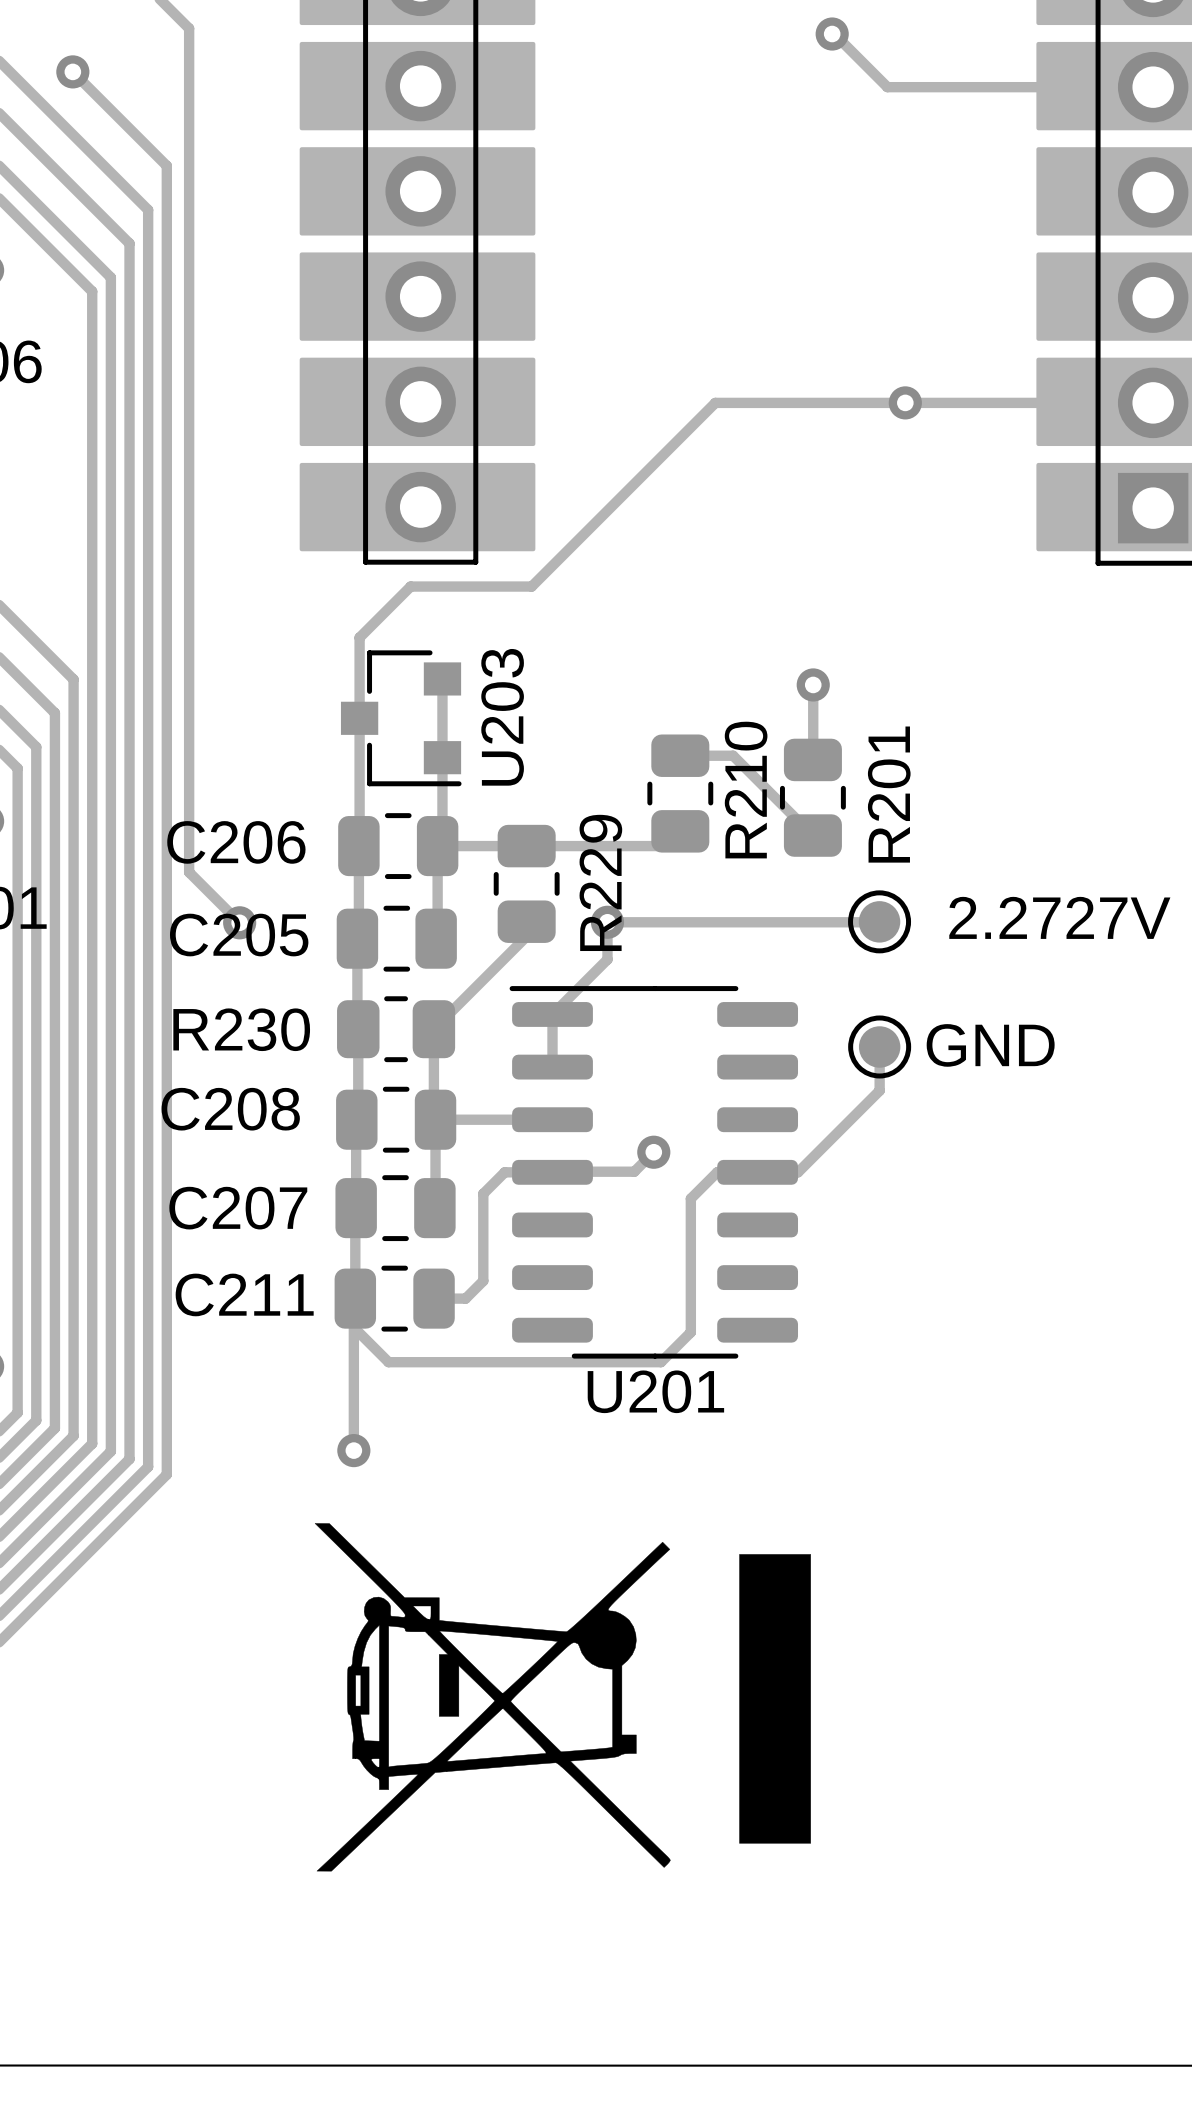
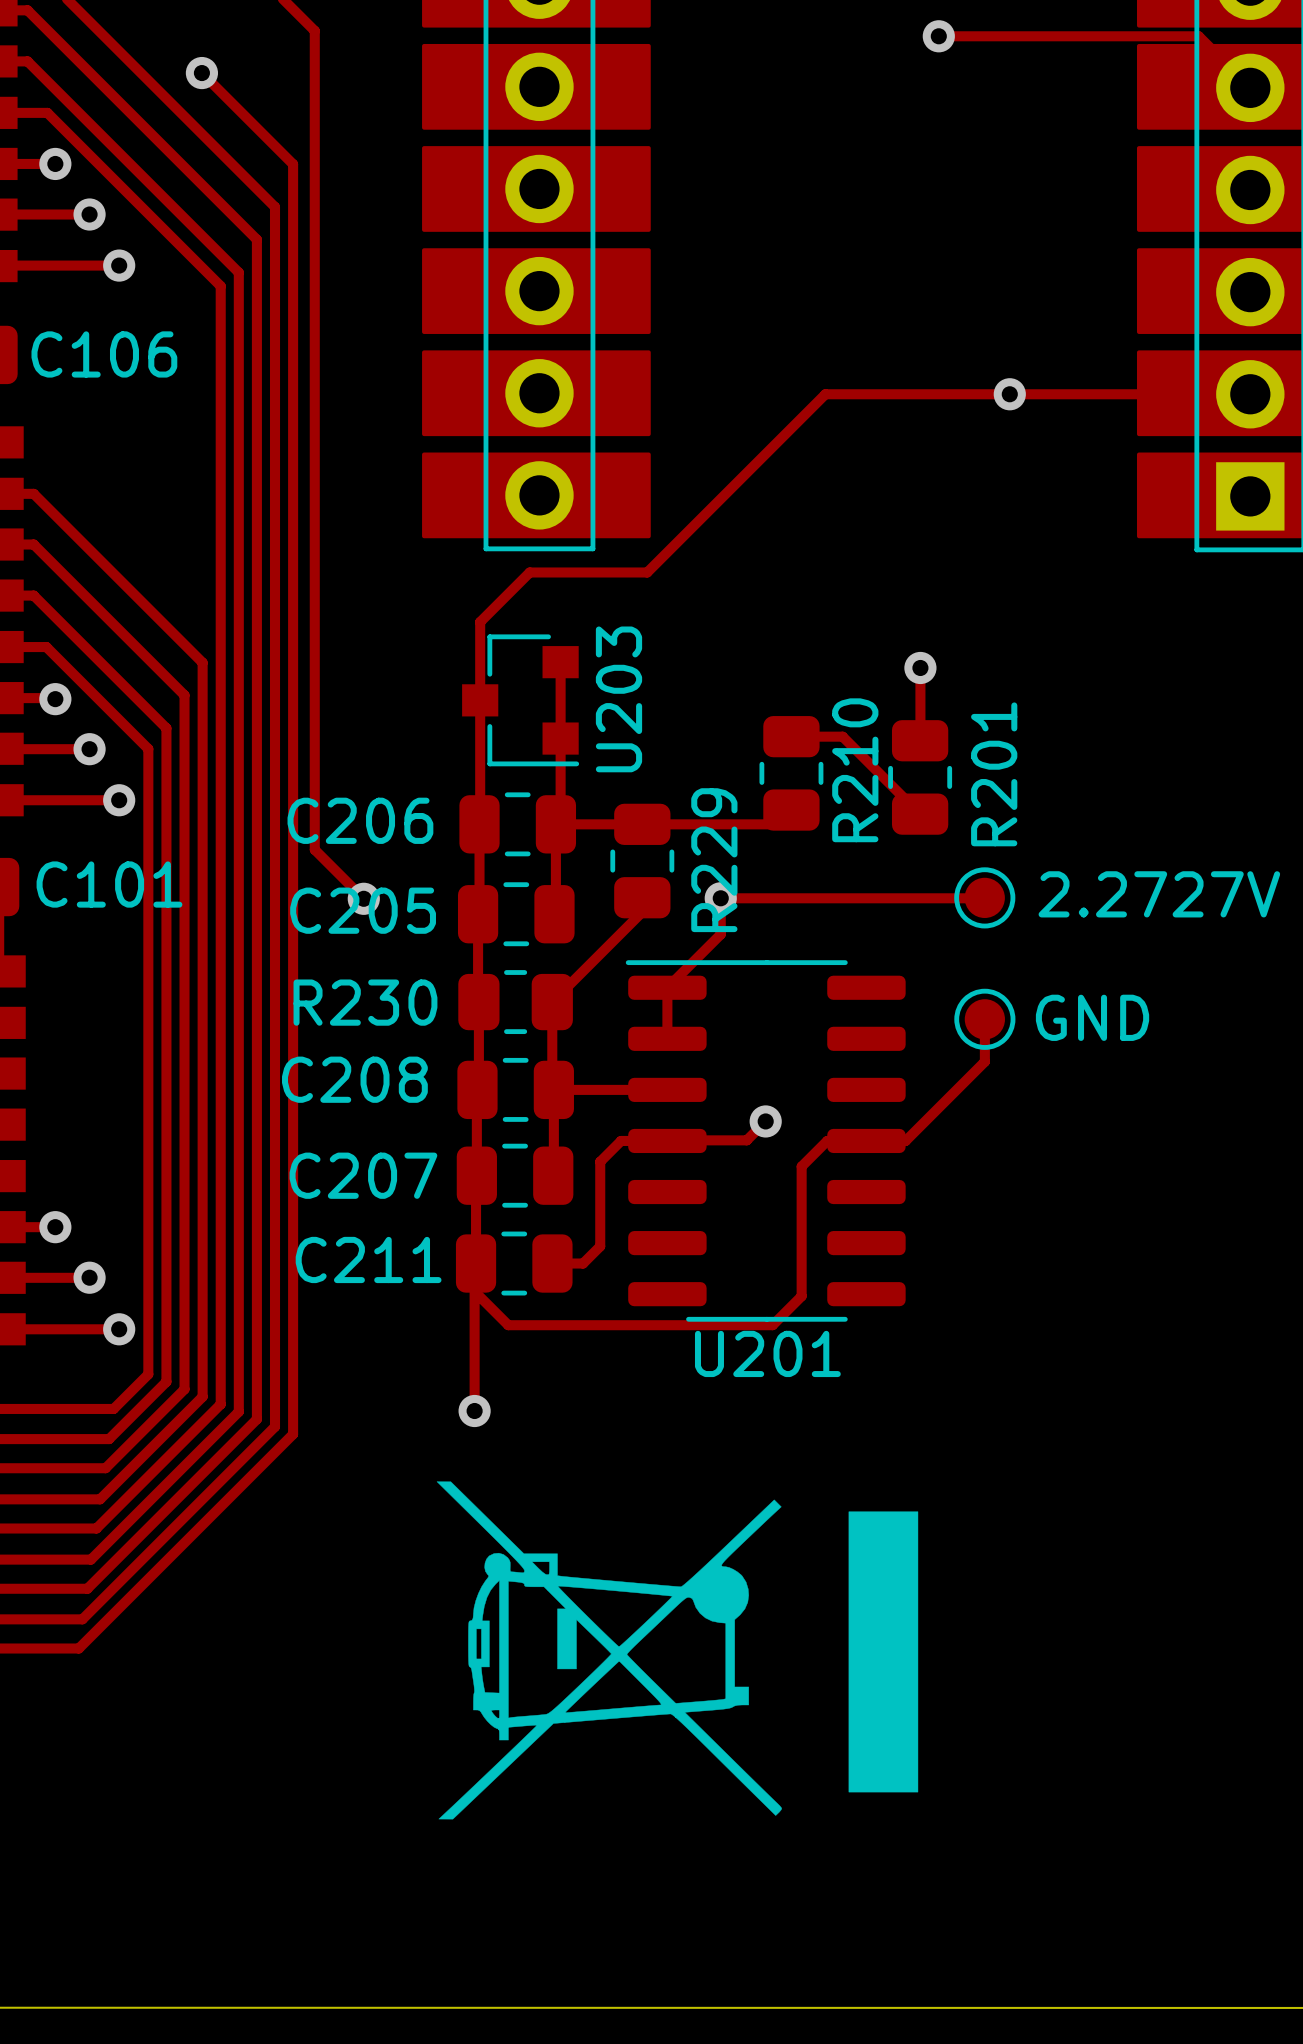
track: (834, 34) (887, 87) (1153, 87) -> (940, 36) (1198, 36) (1250, 87)

